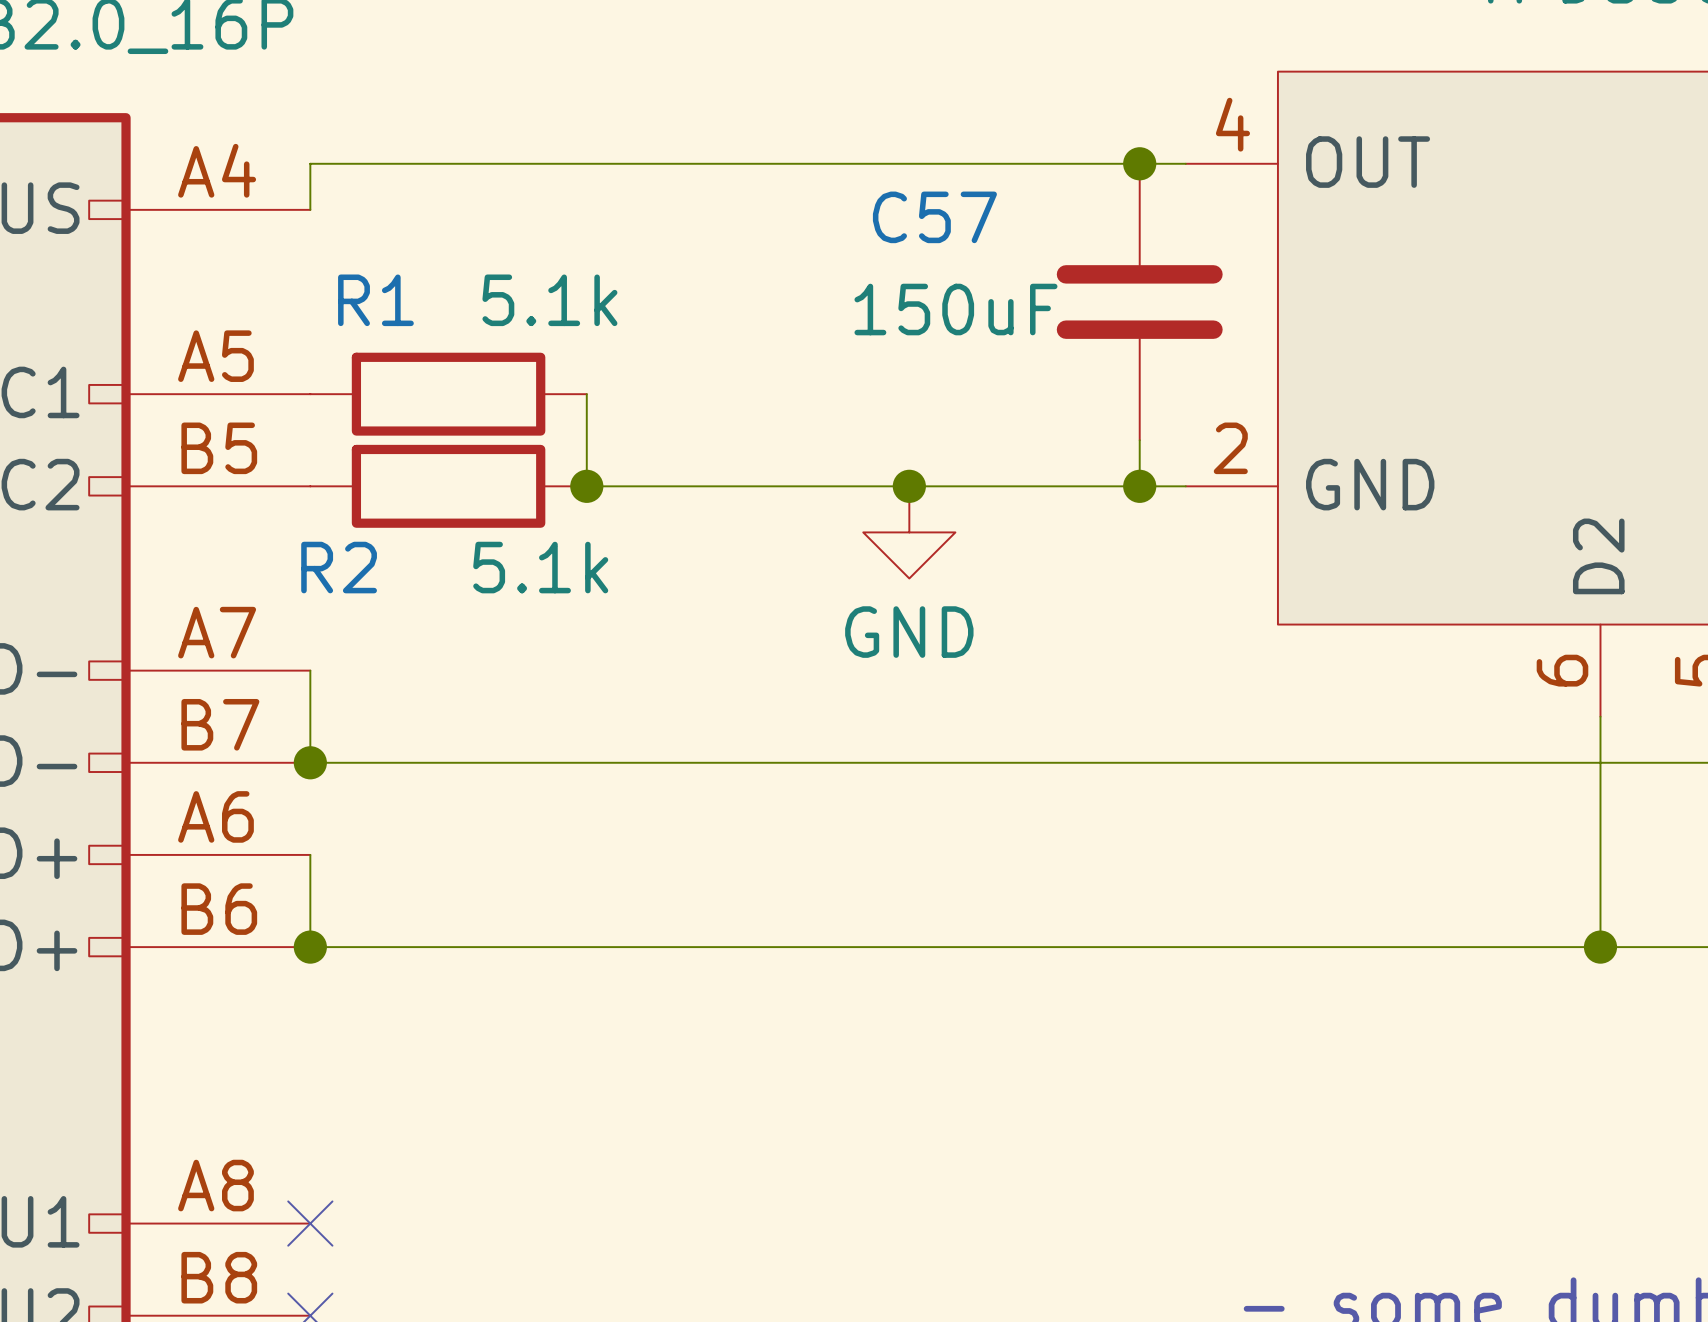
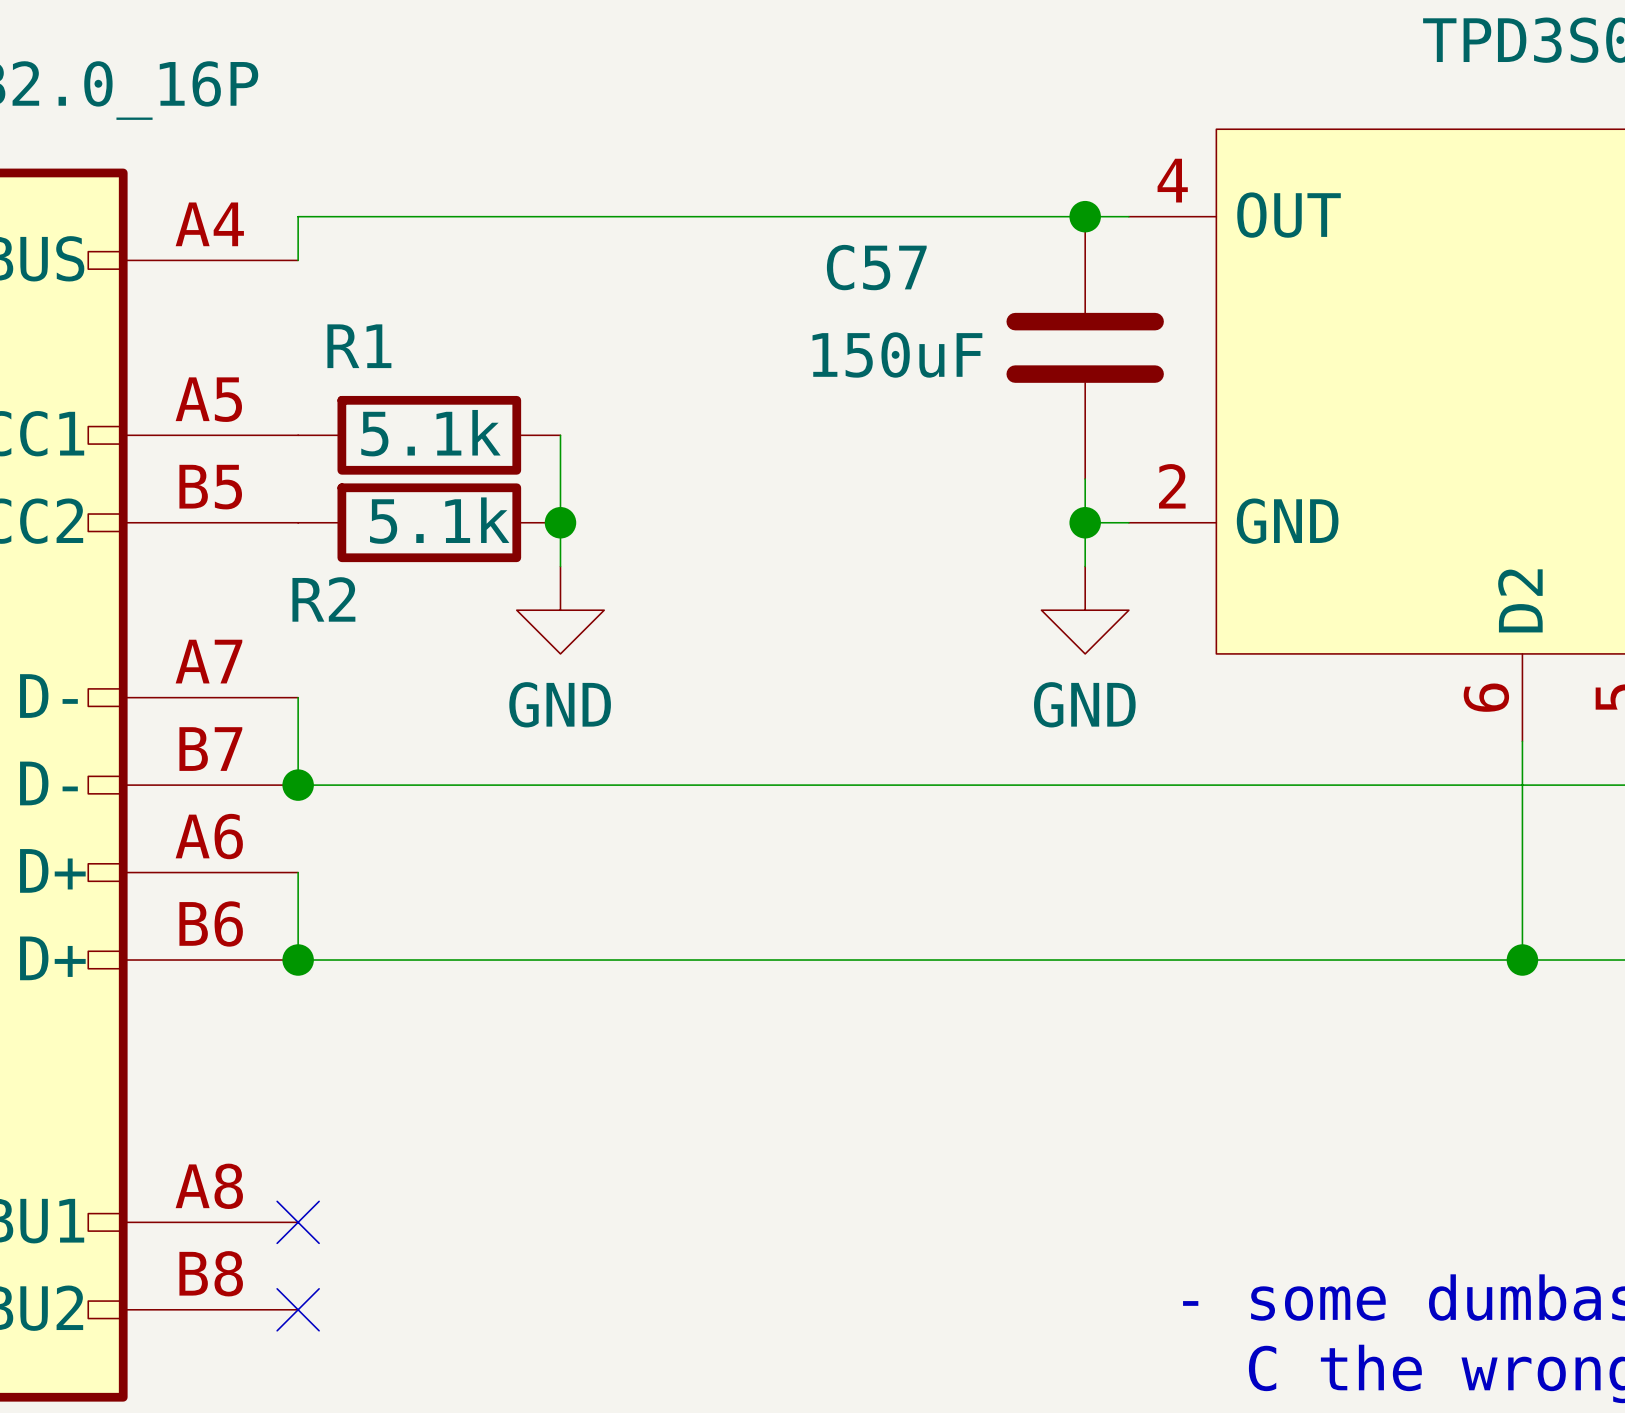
R1 value position: 5.1k (549, 300) -> 5.1k (430, 433)
wire: (586, 486) (1139, 486) -> (560, 522) (560, 566)
junction: (909, 486) -> none
wire: none -> (1085, 522) (1085, 566)
power symbol: GND (909, 532) -> none
R2 value position: 5.1k (540, 567) -> 5.1k (439, 520)
power symbol: none -> GND (560, 610)
power symbol: none -> GND (1085, 610)

